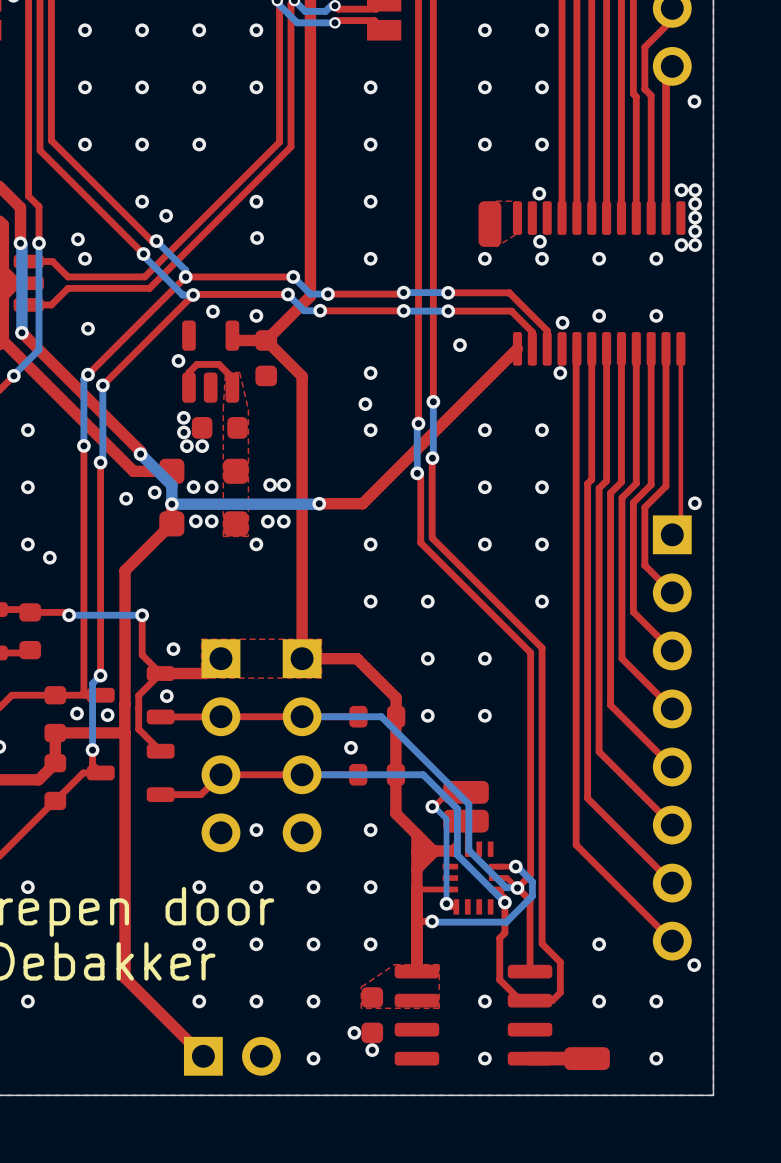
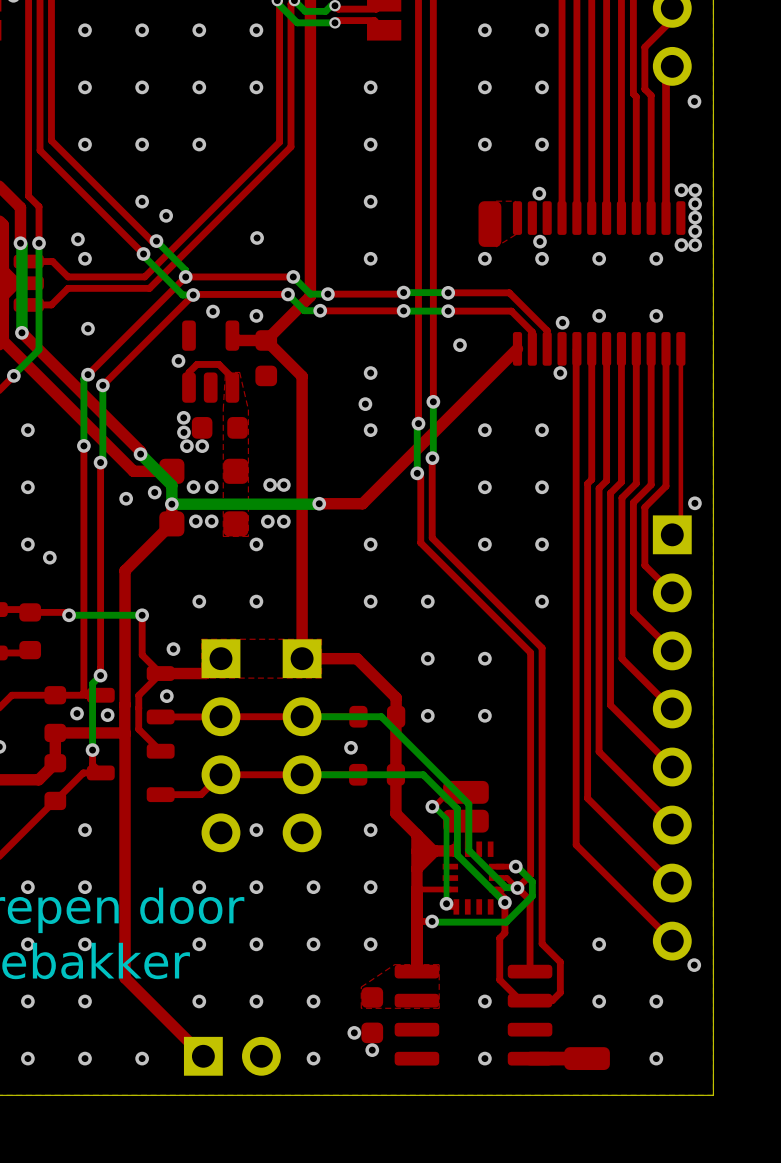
via: (256, 201) -> none
via: none -> (199, 601)
via: none -> (256, 601)
via: none -> (85, 830)
via: none -> (85, 887)
via: none -> (27, 944)
via: none -> (85, 944)
via: none -> (85, 1001)
via: none -> (27, 1058)
via: none -> (85, 1058)
via: none -> (142, 1058)

